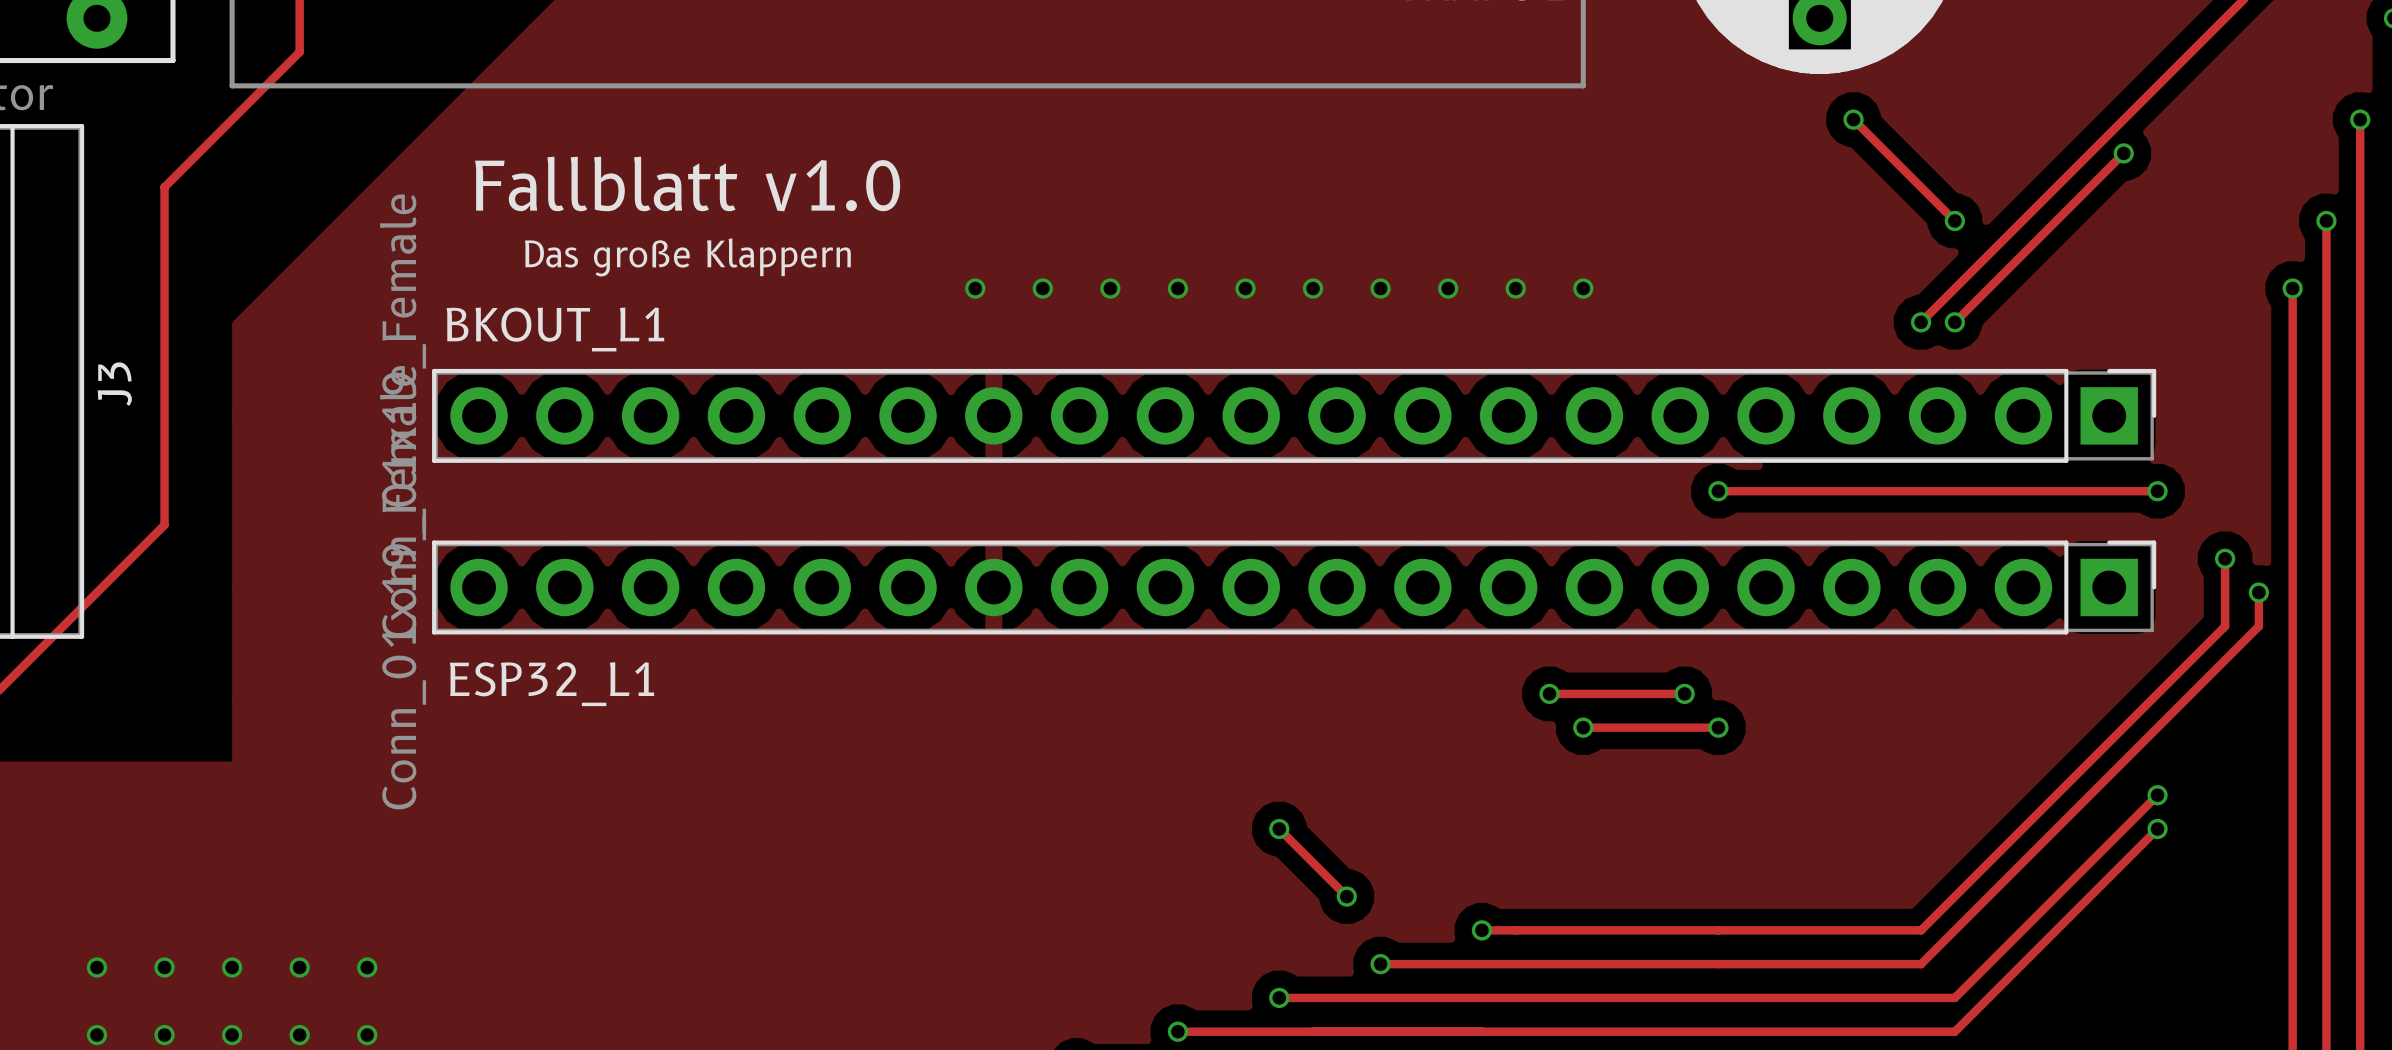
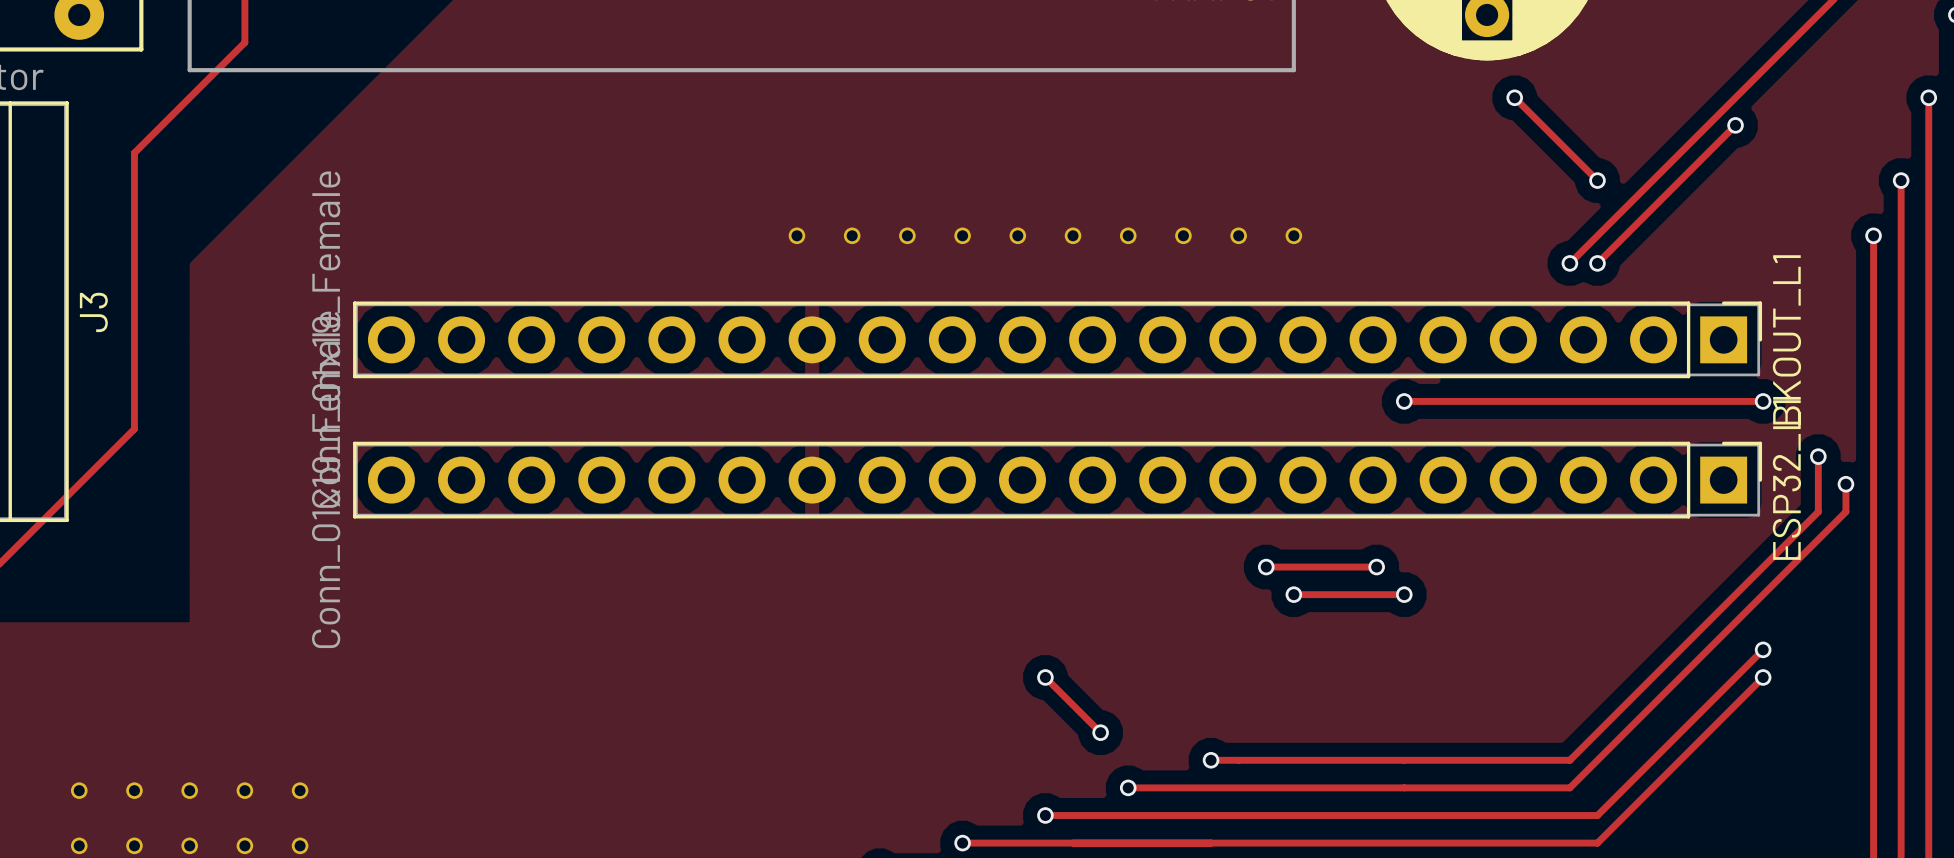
text: Fallblatt v1.0 (687, 183) -> none
text: Das große Klappern (687, 257) -> none
BKOUT_L1 name rotation: 0° (555, 329) -> 90° counterclockwise (1786, 339)
BKOUT_L1 name position: BKOUT_L1 (555, 329) -> BKOUT_L1 (1786, 339)
ESP32_L1 name rotation: 0° (552, 684) -> 90° counterclockwise (1786, 480)
ESP32_L1 name position: ESP32_L1 (552, 684) -> ESP32_L1 (1786, 480)

